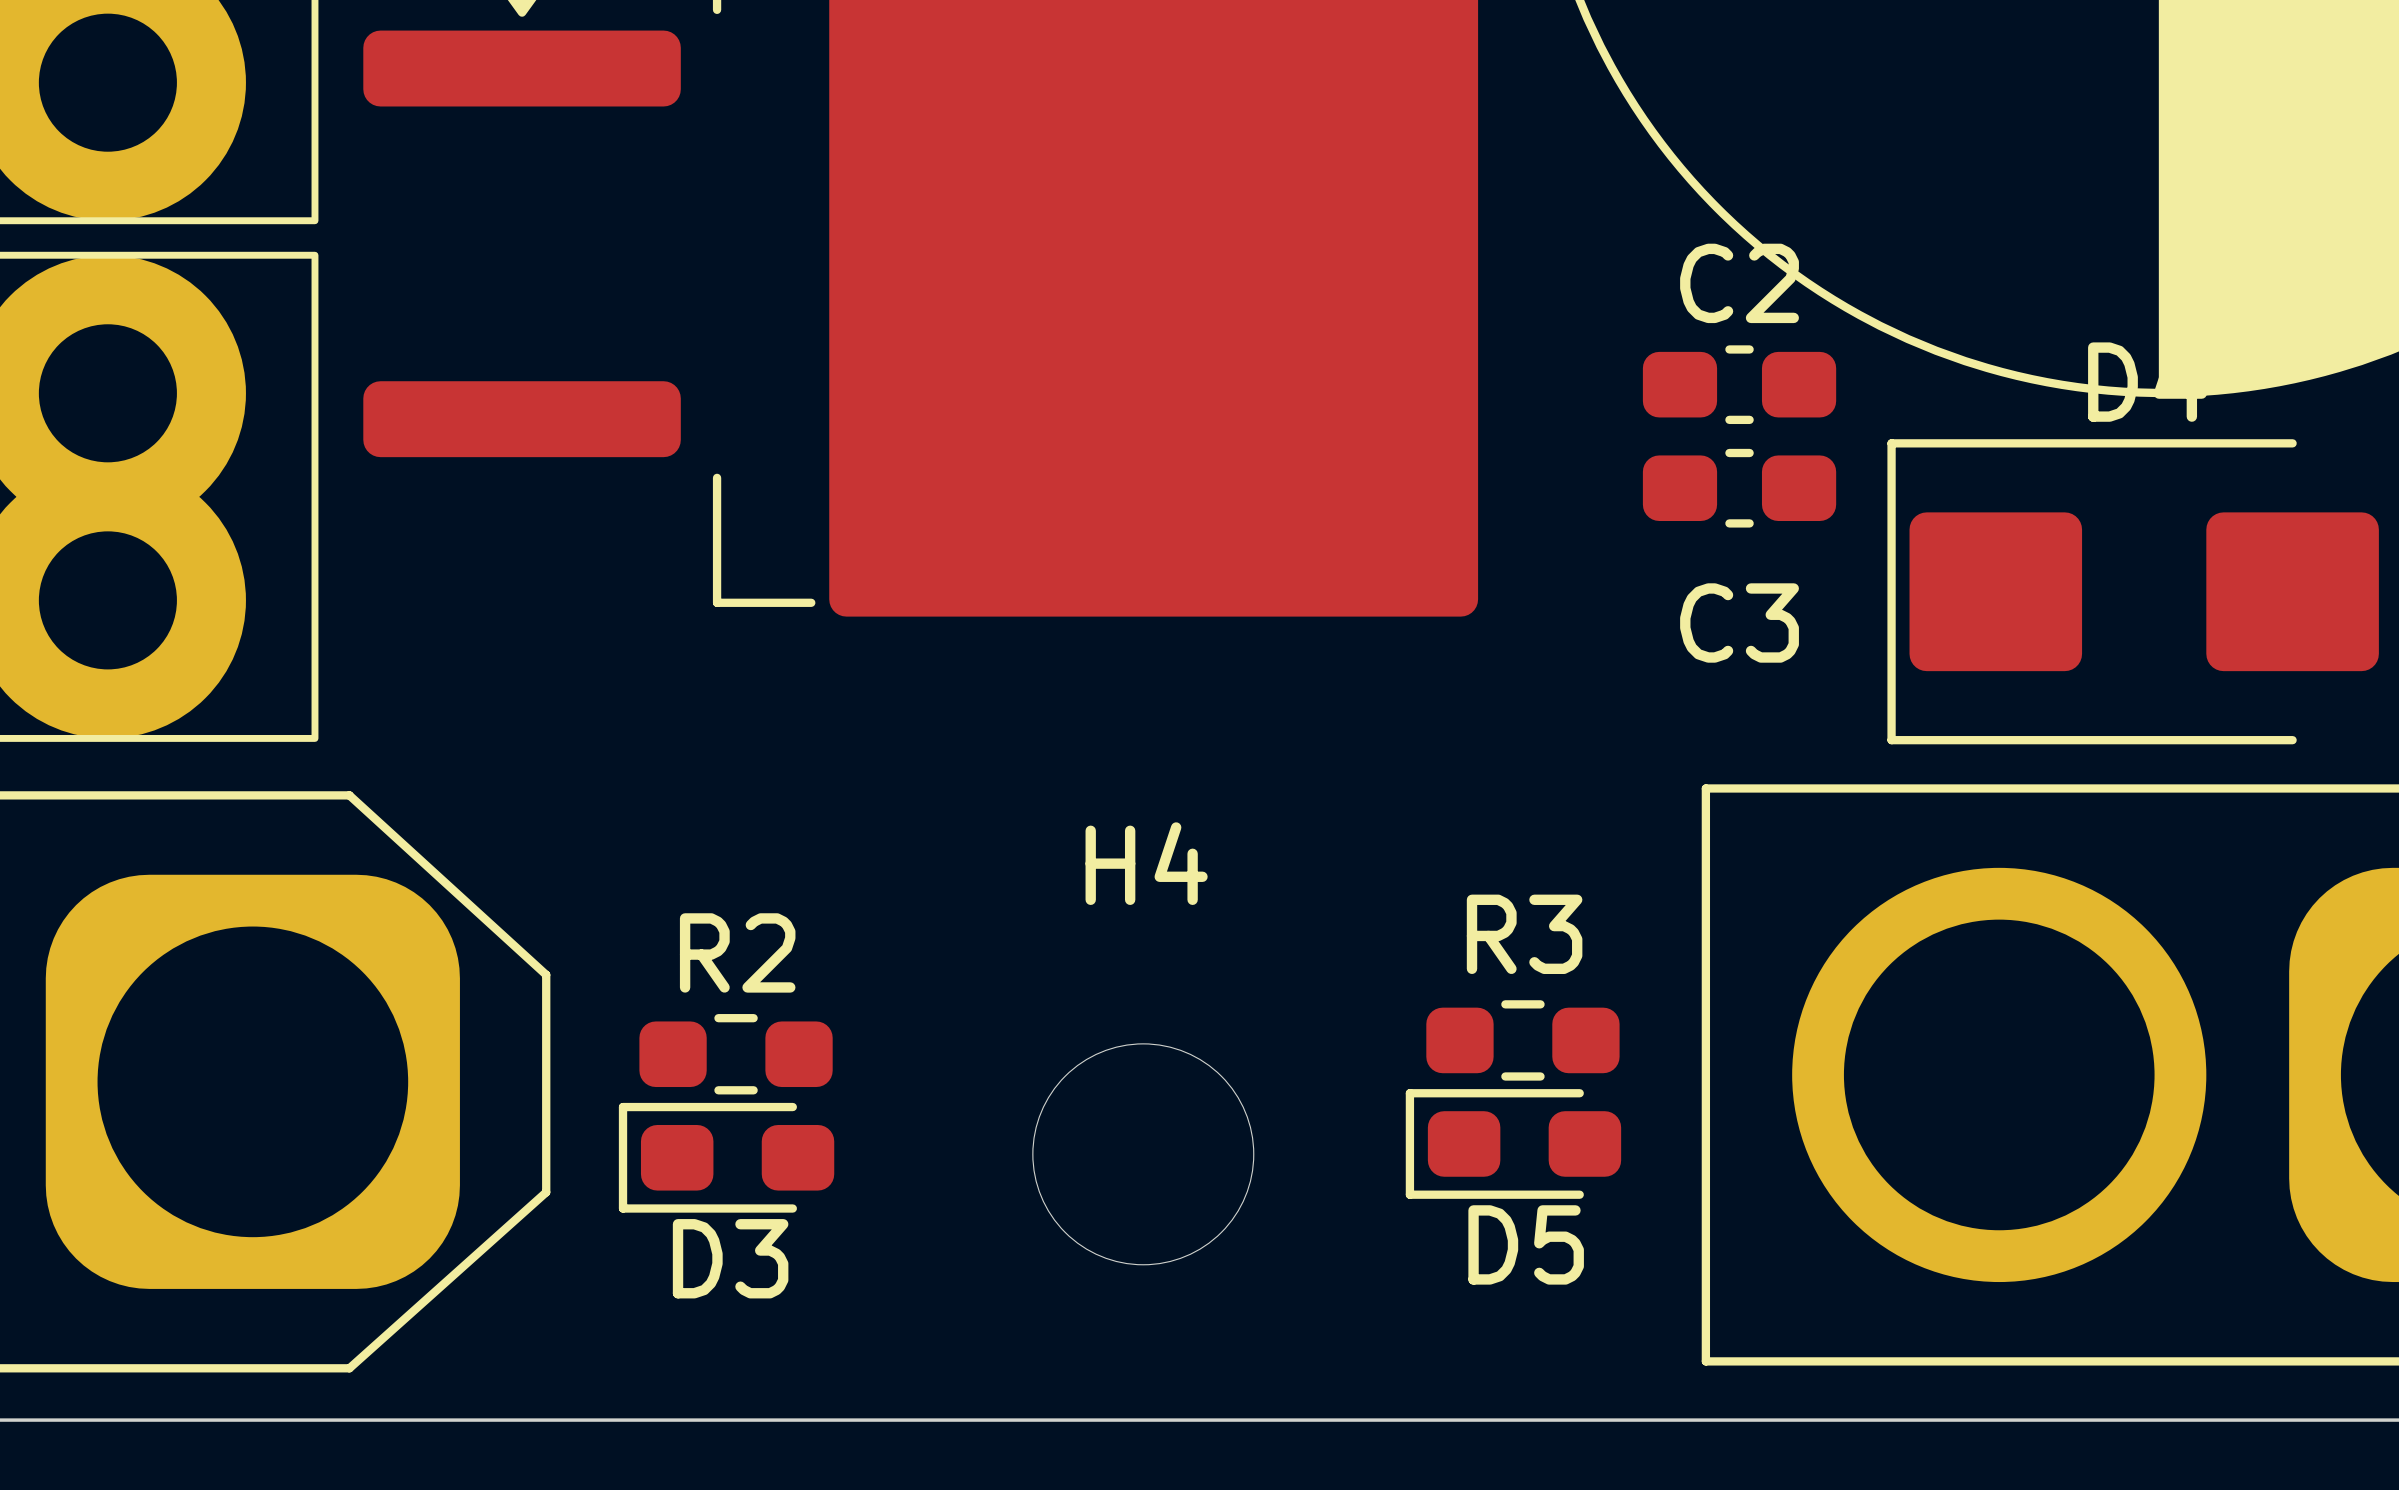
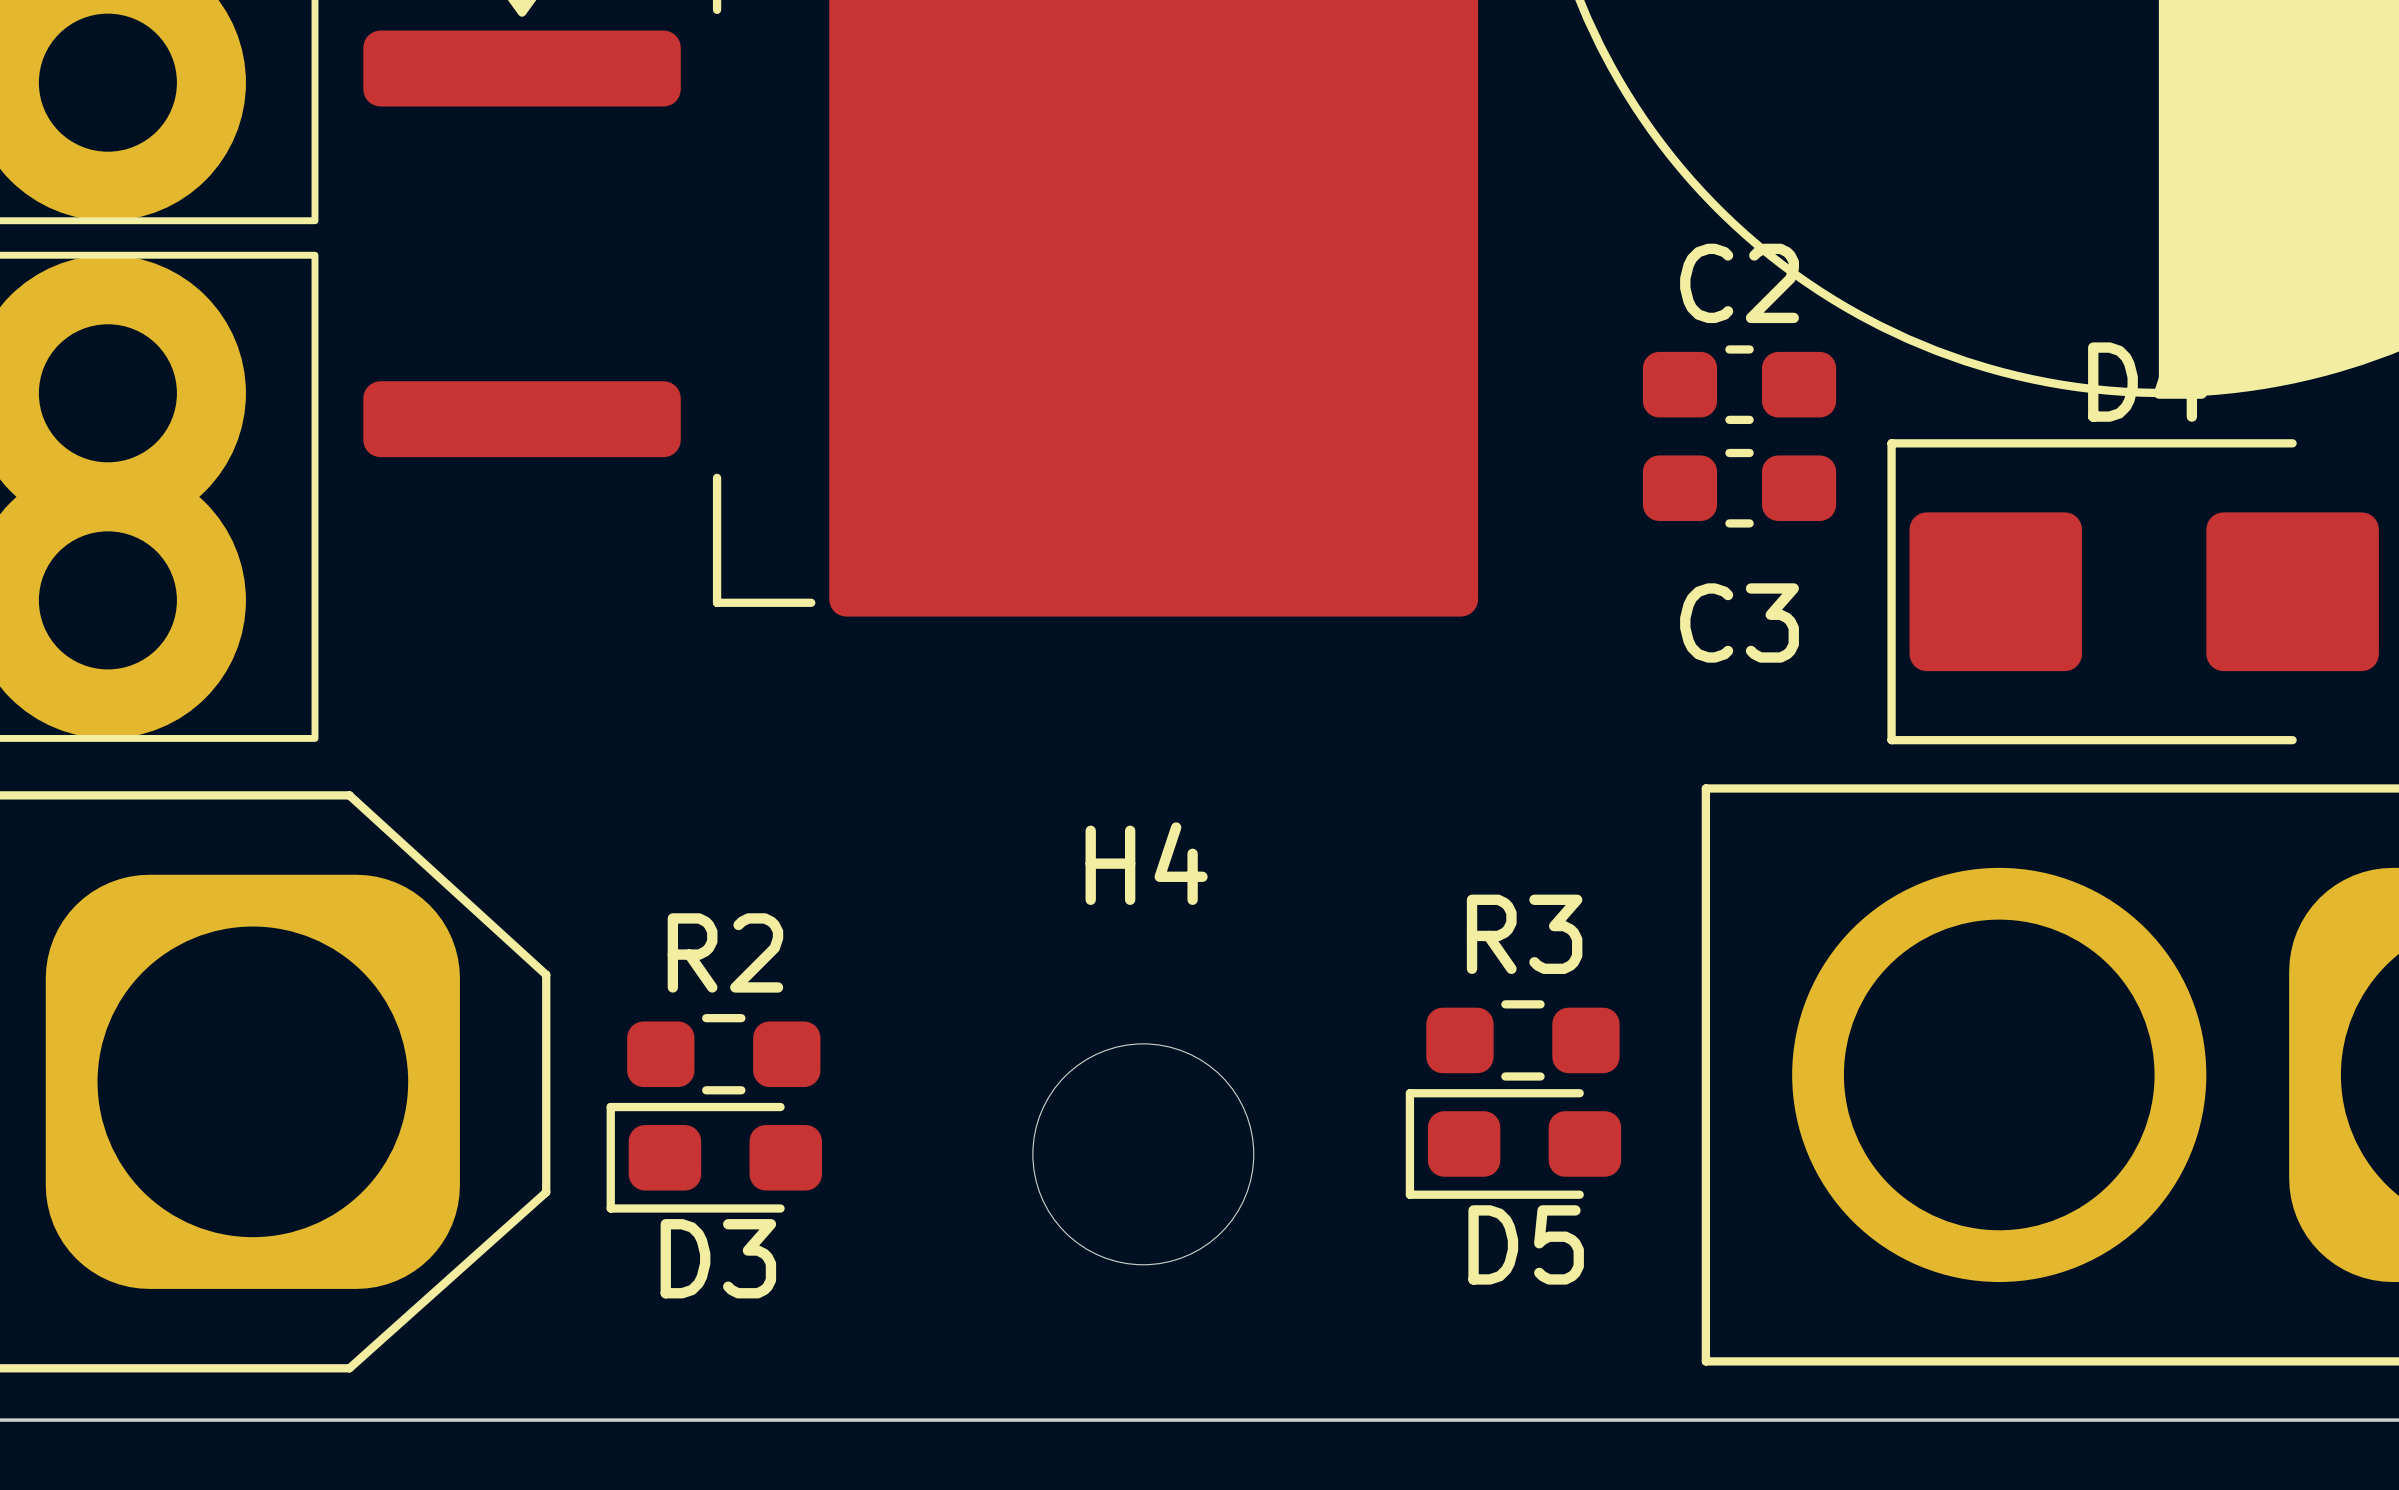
R2 position: (736, 1054) -> (723, 1054)
D3 position: (726, 1157) -> (714, 1157)

